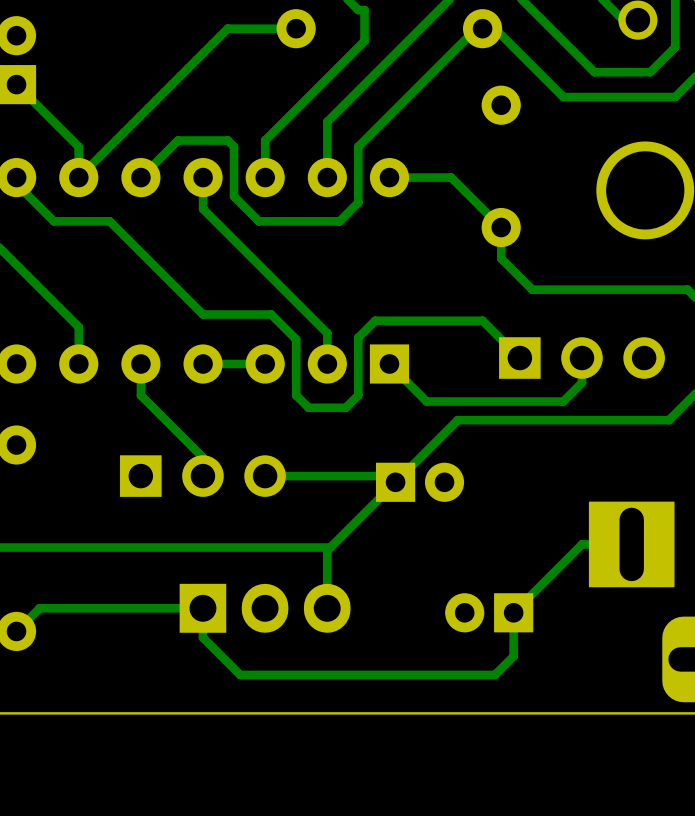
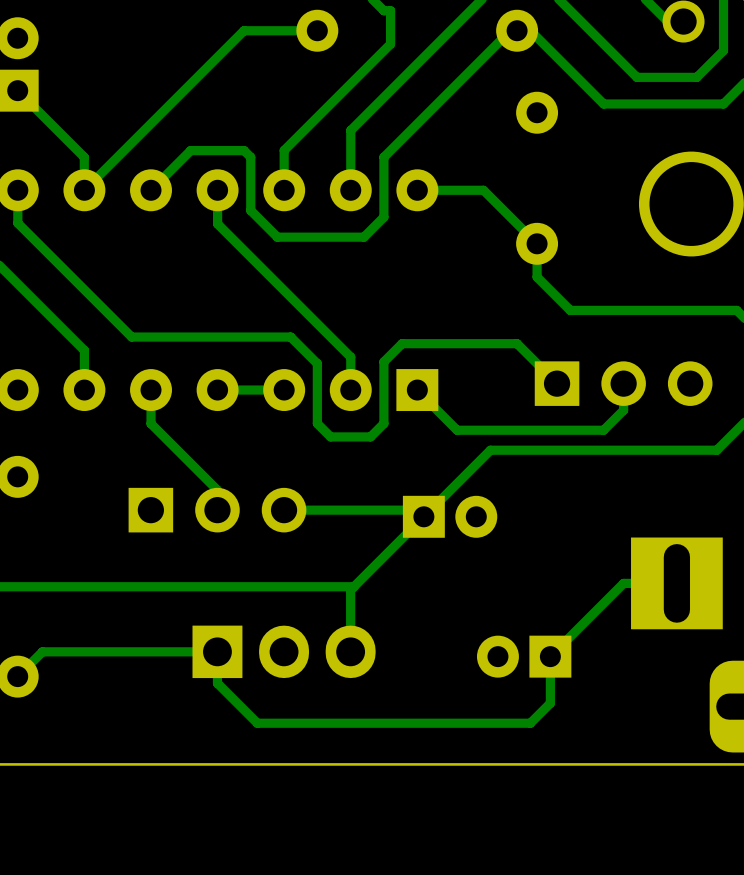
track: (16, 184) (53, 221) (109, 221) (202, 314) -> (17, 197) (17, 223) (131, 337) (217, 337)

